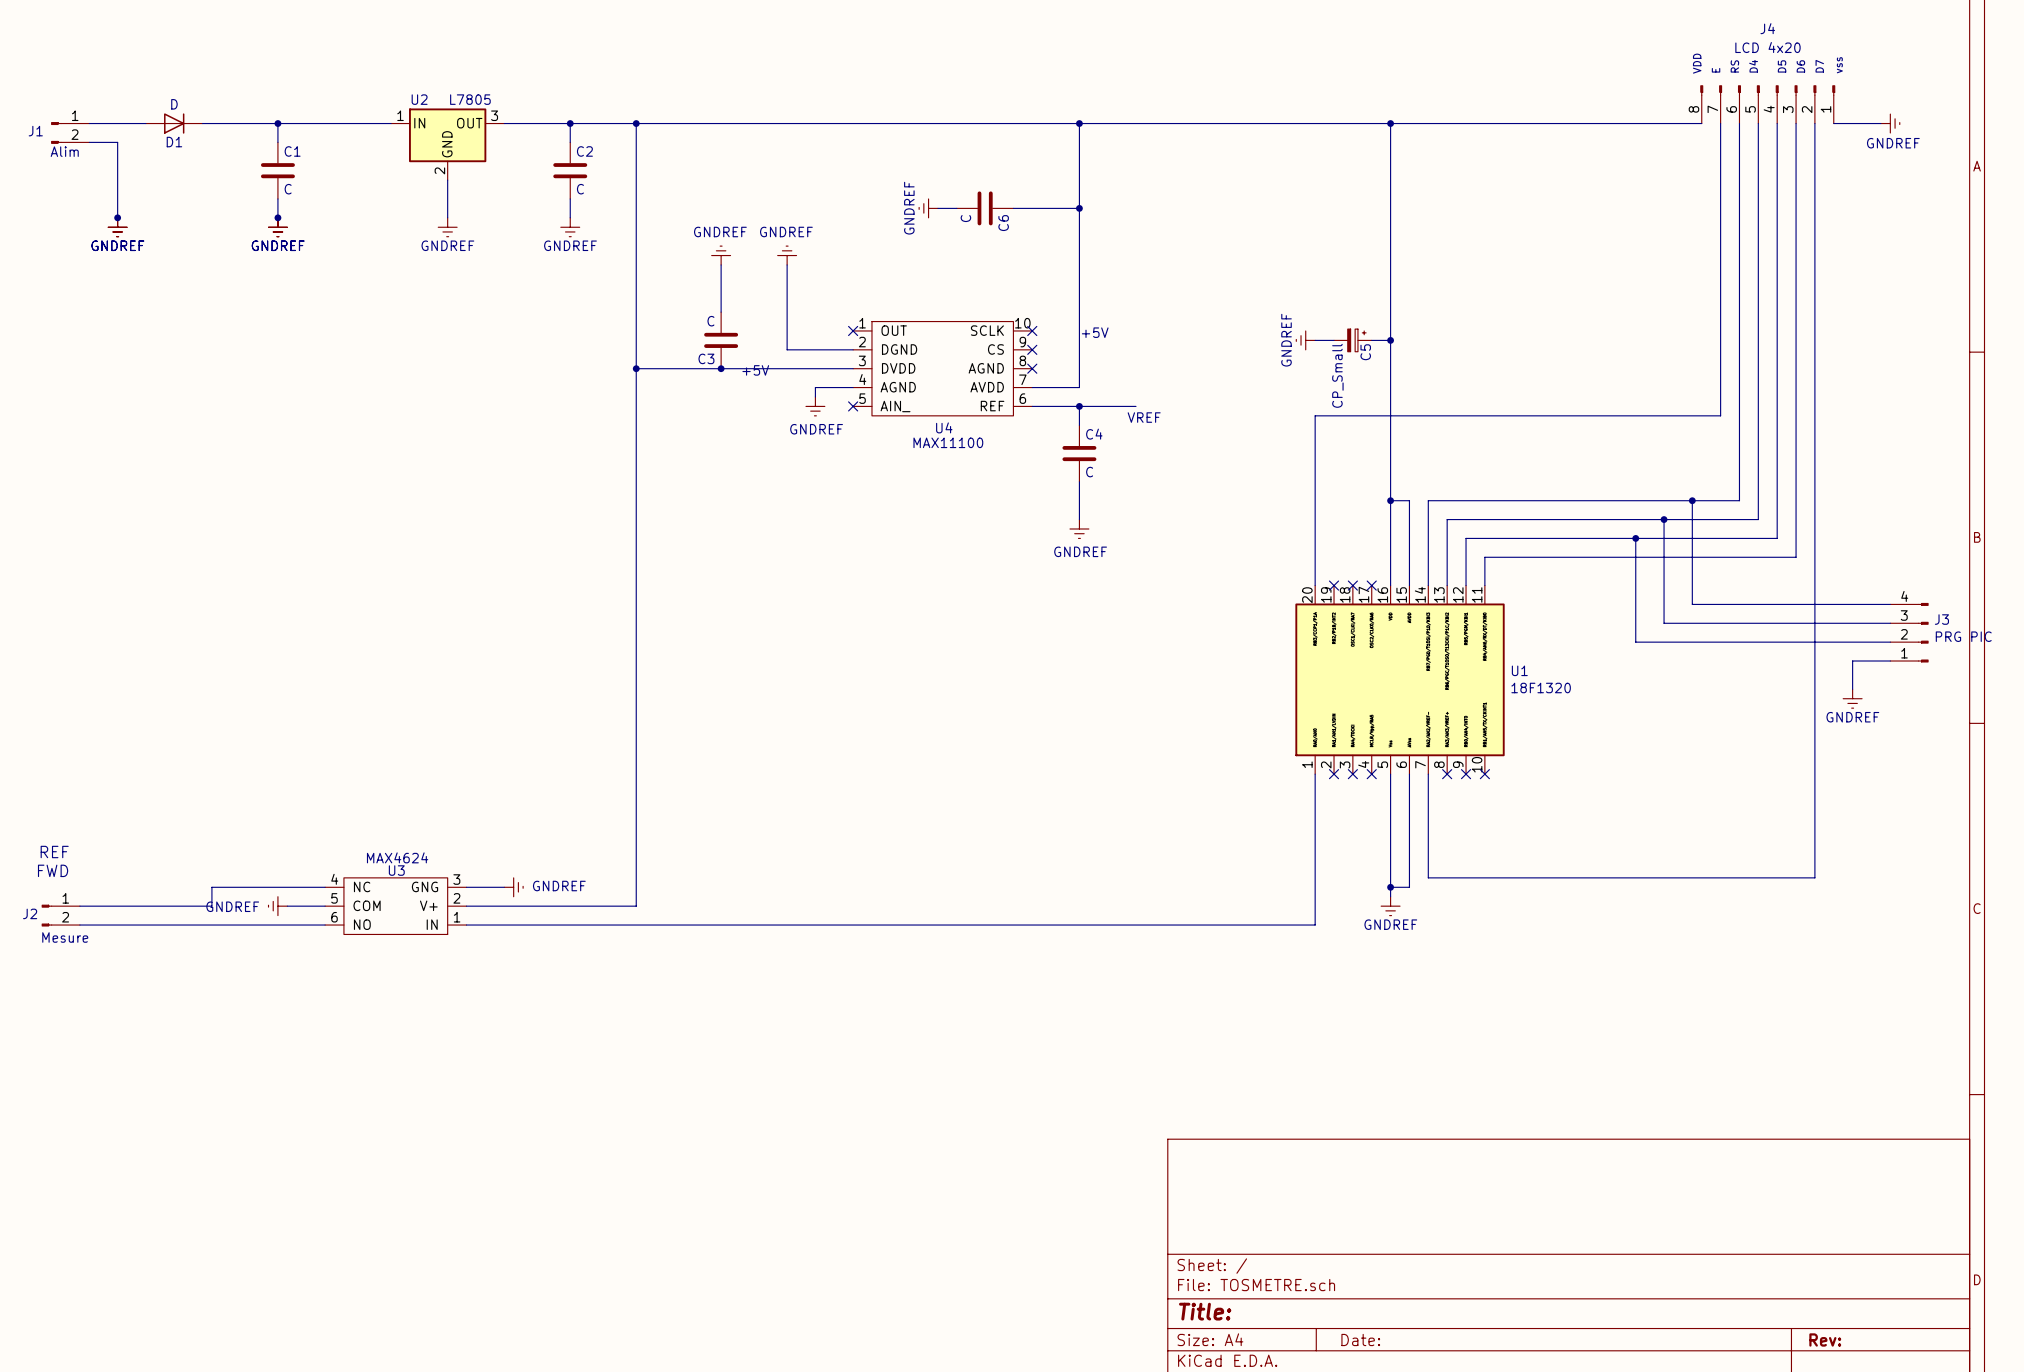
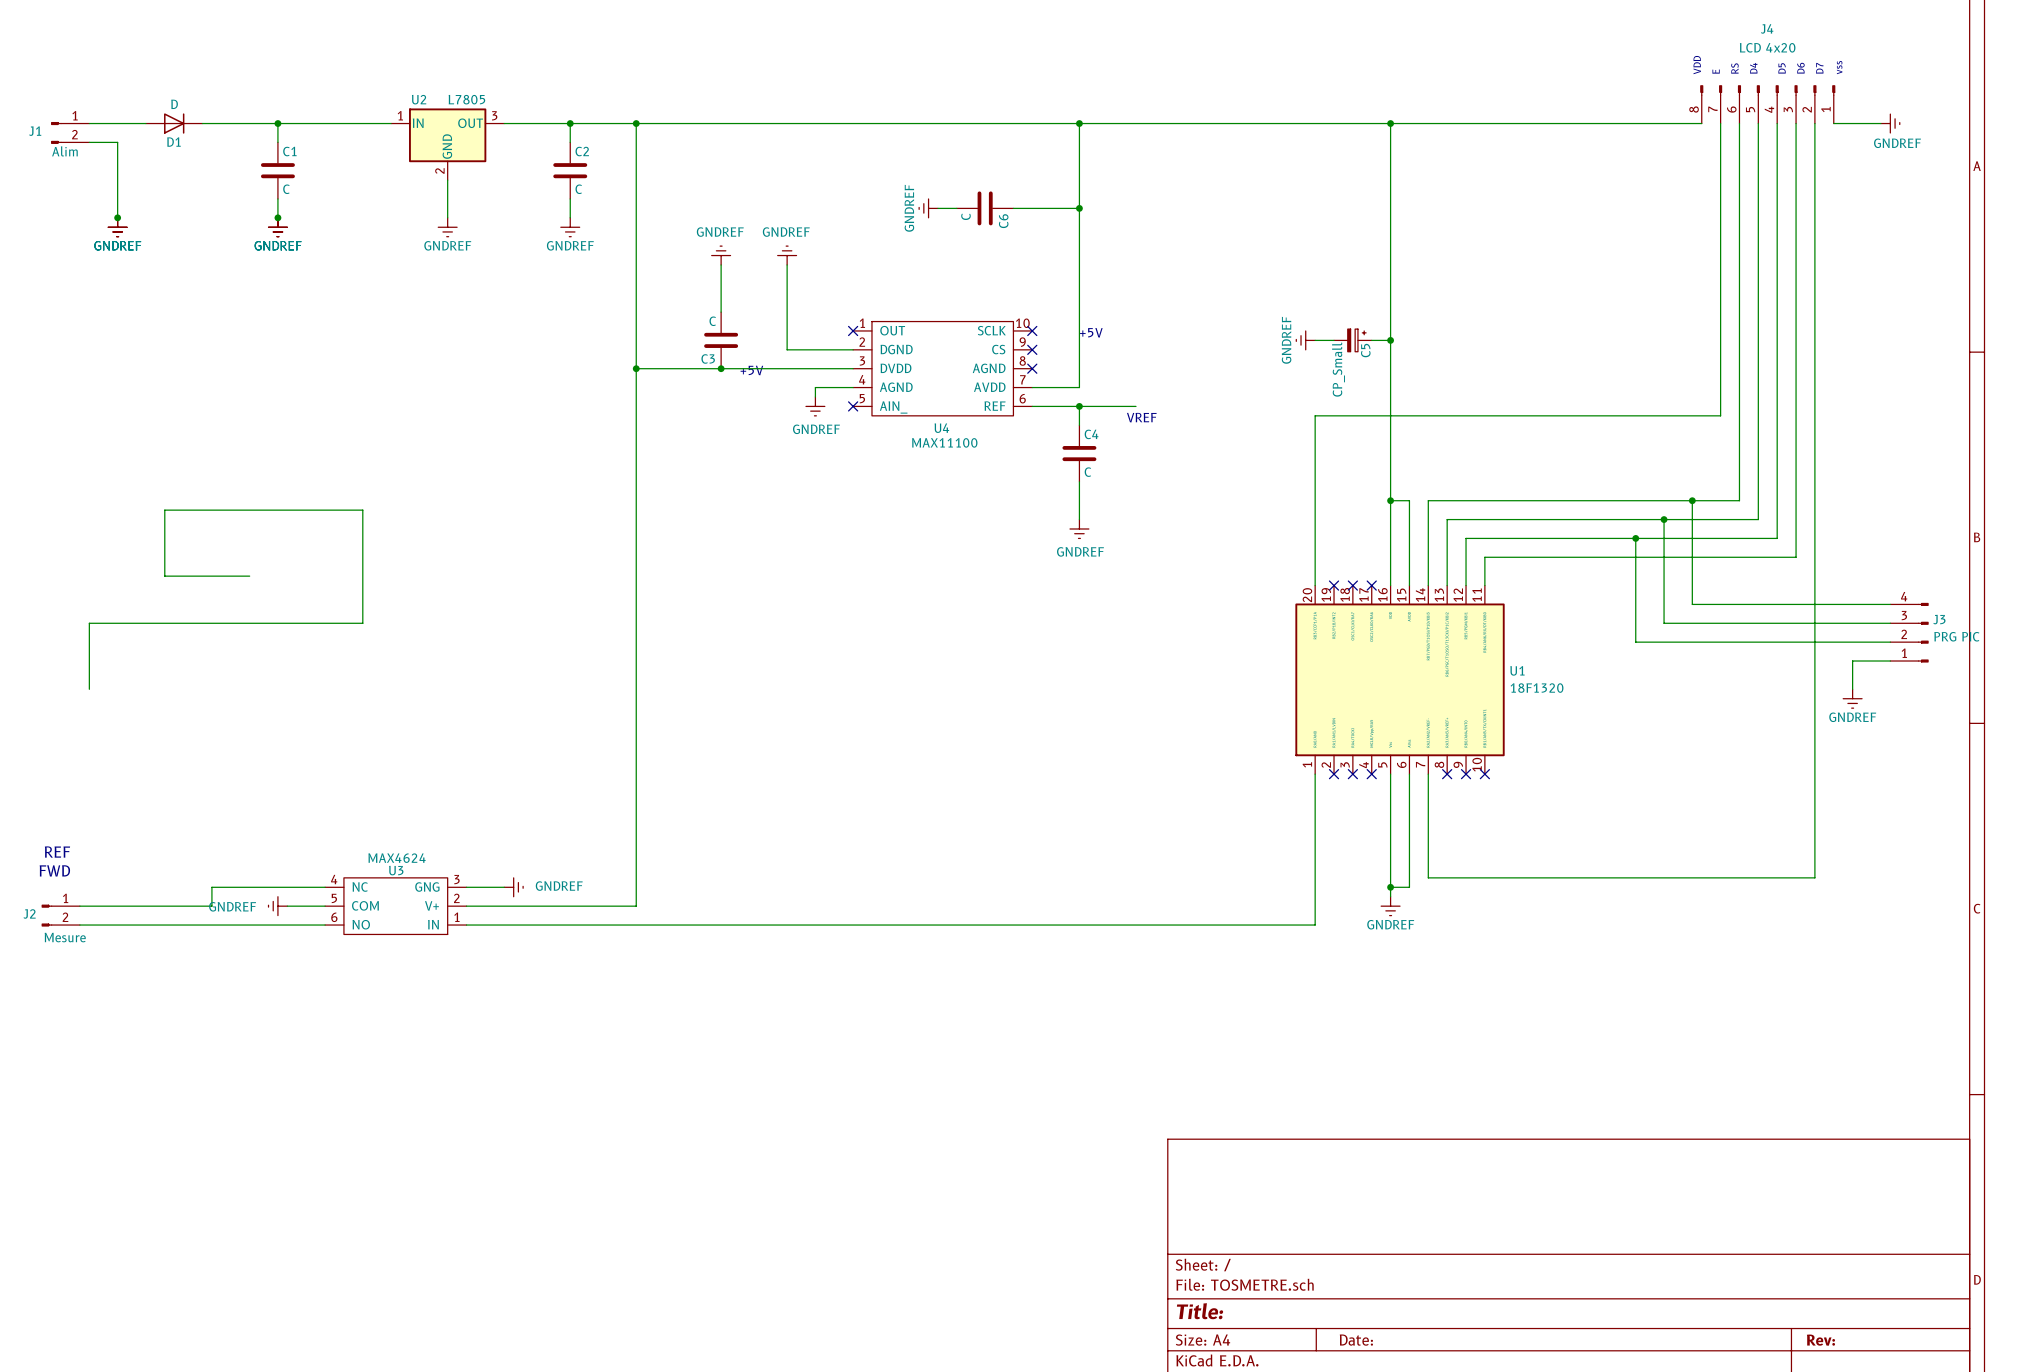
wire: none -> (249, 576) (164, 576) (164, 510) (362, 510) (362, 623) (89, 623) (89, 689)

